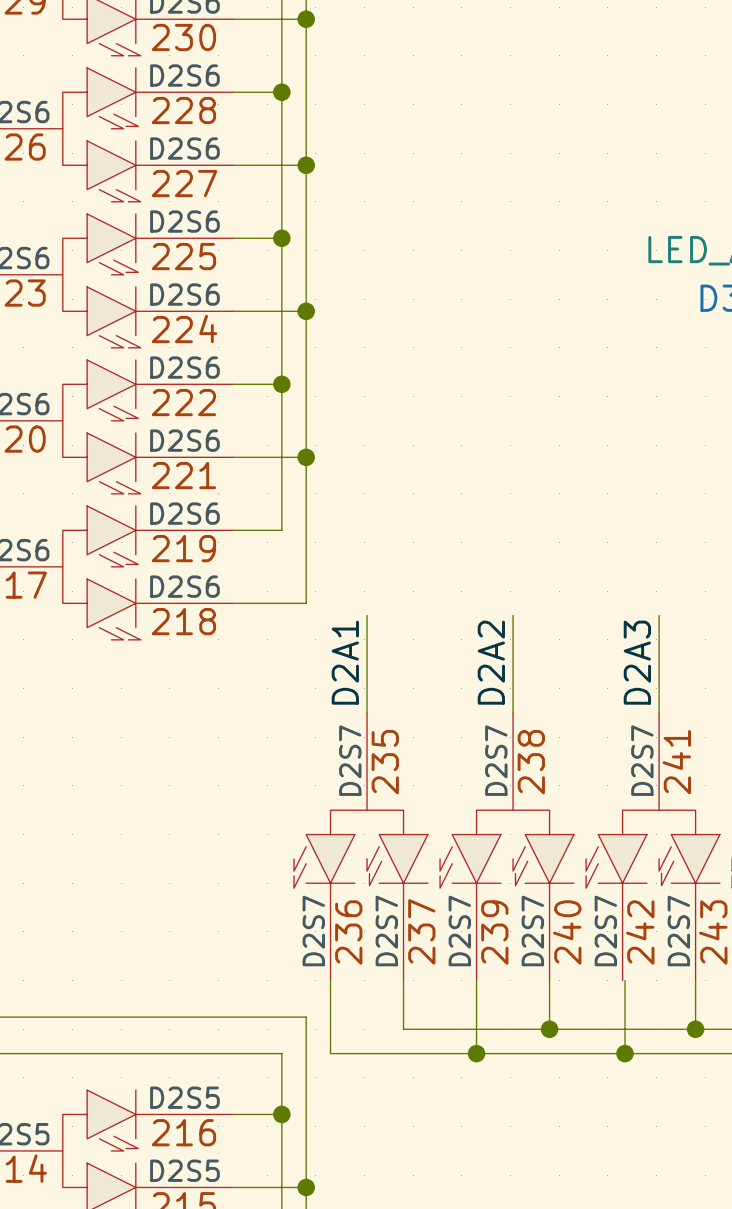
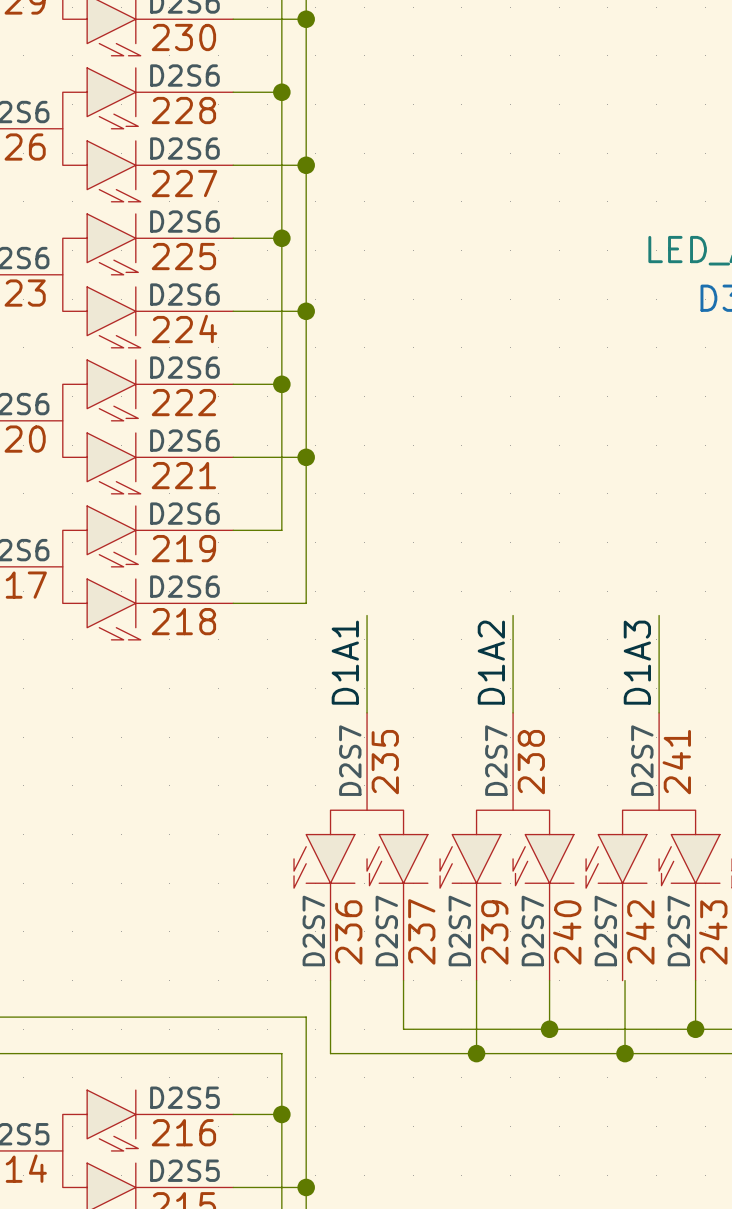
label: D2A1 (345, 662) -> D1A1 (345, 662)
label: D2A2 (491, 662) -> D1A2 (491, 662)
label: D2A3 (637, 662) -> D1A3 (637, 662)

